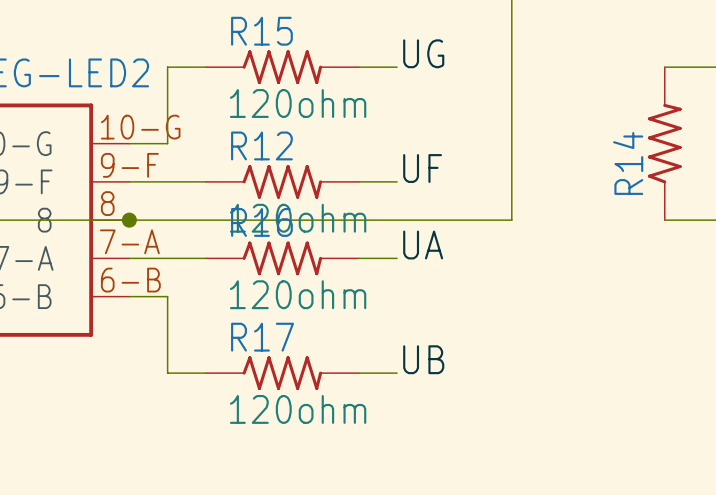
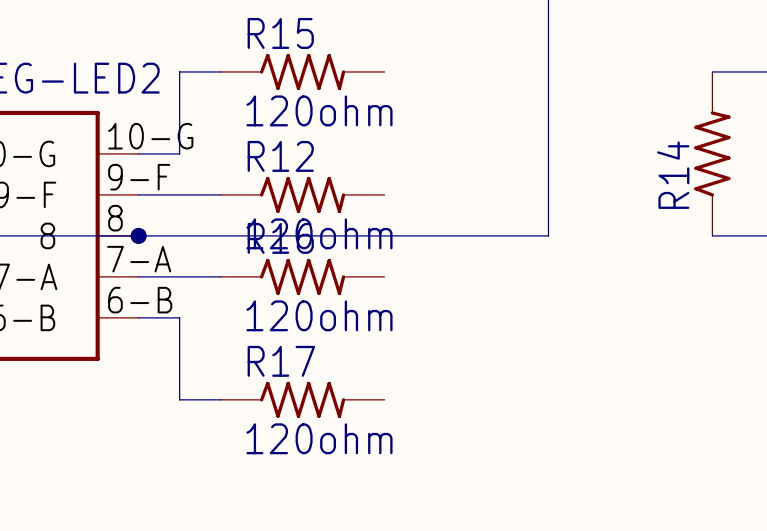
label: UG (423, 53) -> none
wire: (358, 67) (397, 67) -> none
label: UF (422, 168) -> none
wire: (358, 181) (397, 181) -> none
label: UA (423, 245) -> none
wire: (358, 258) (397, 258) -> none
label: UB (423, 359) -> none
wire: (358, 373) (397, 373) -> none

